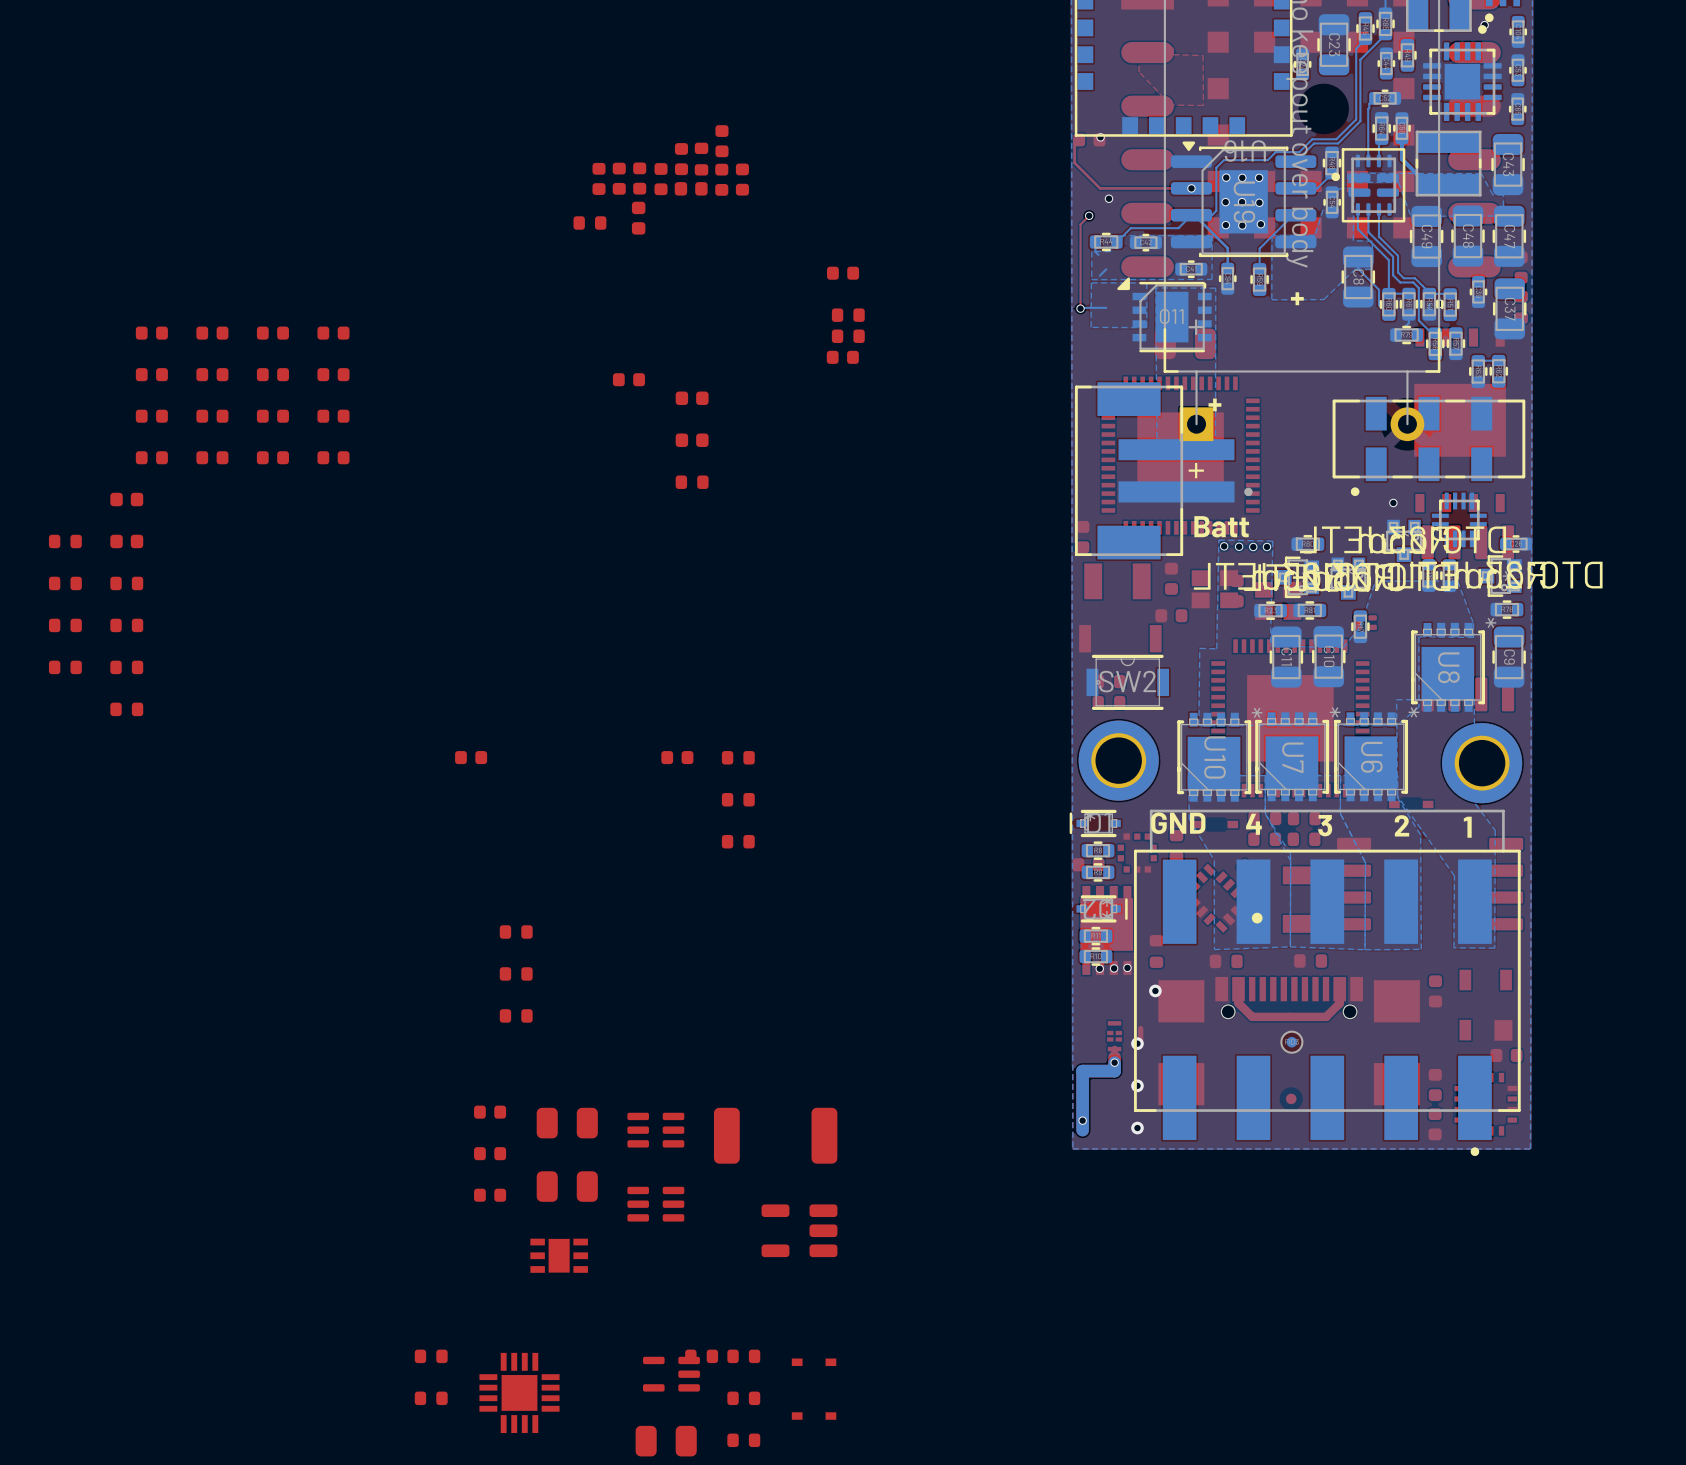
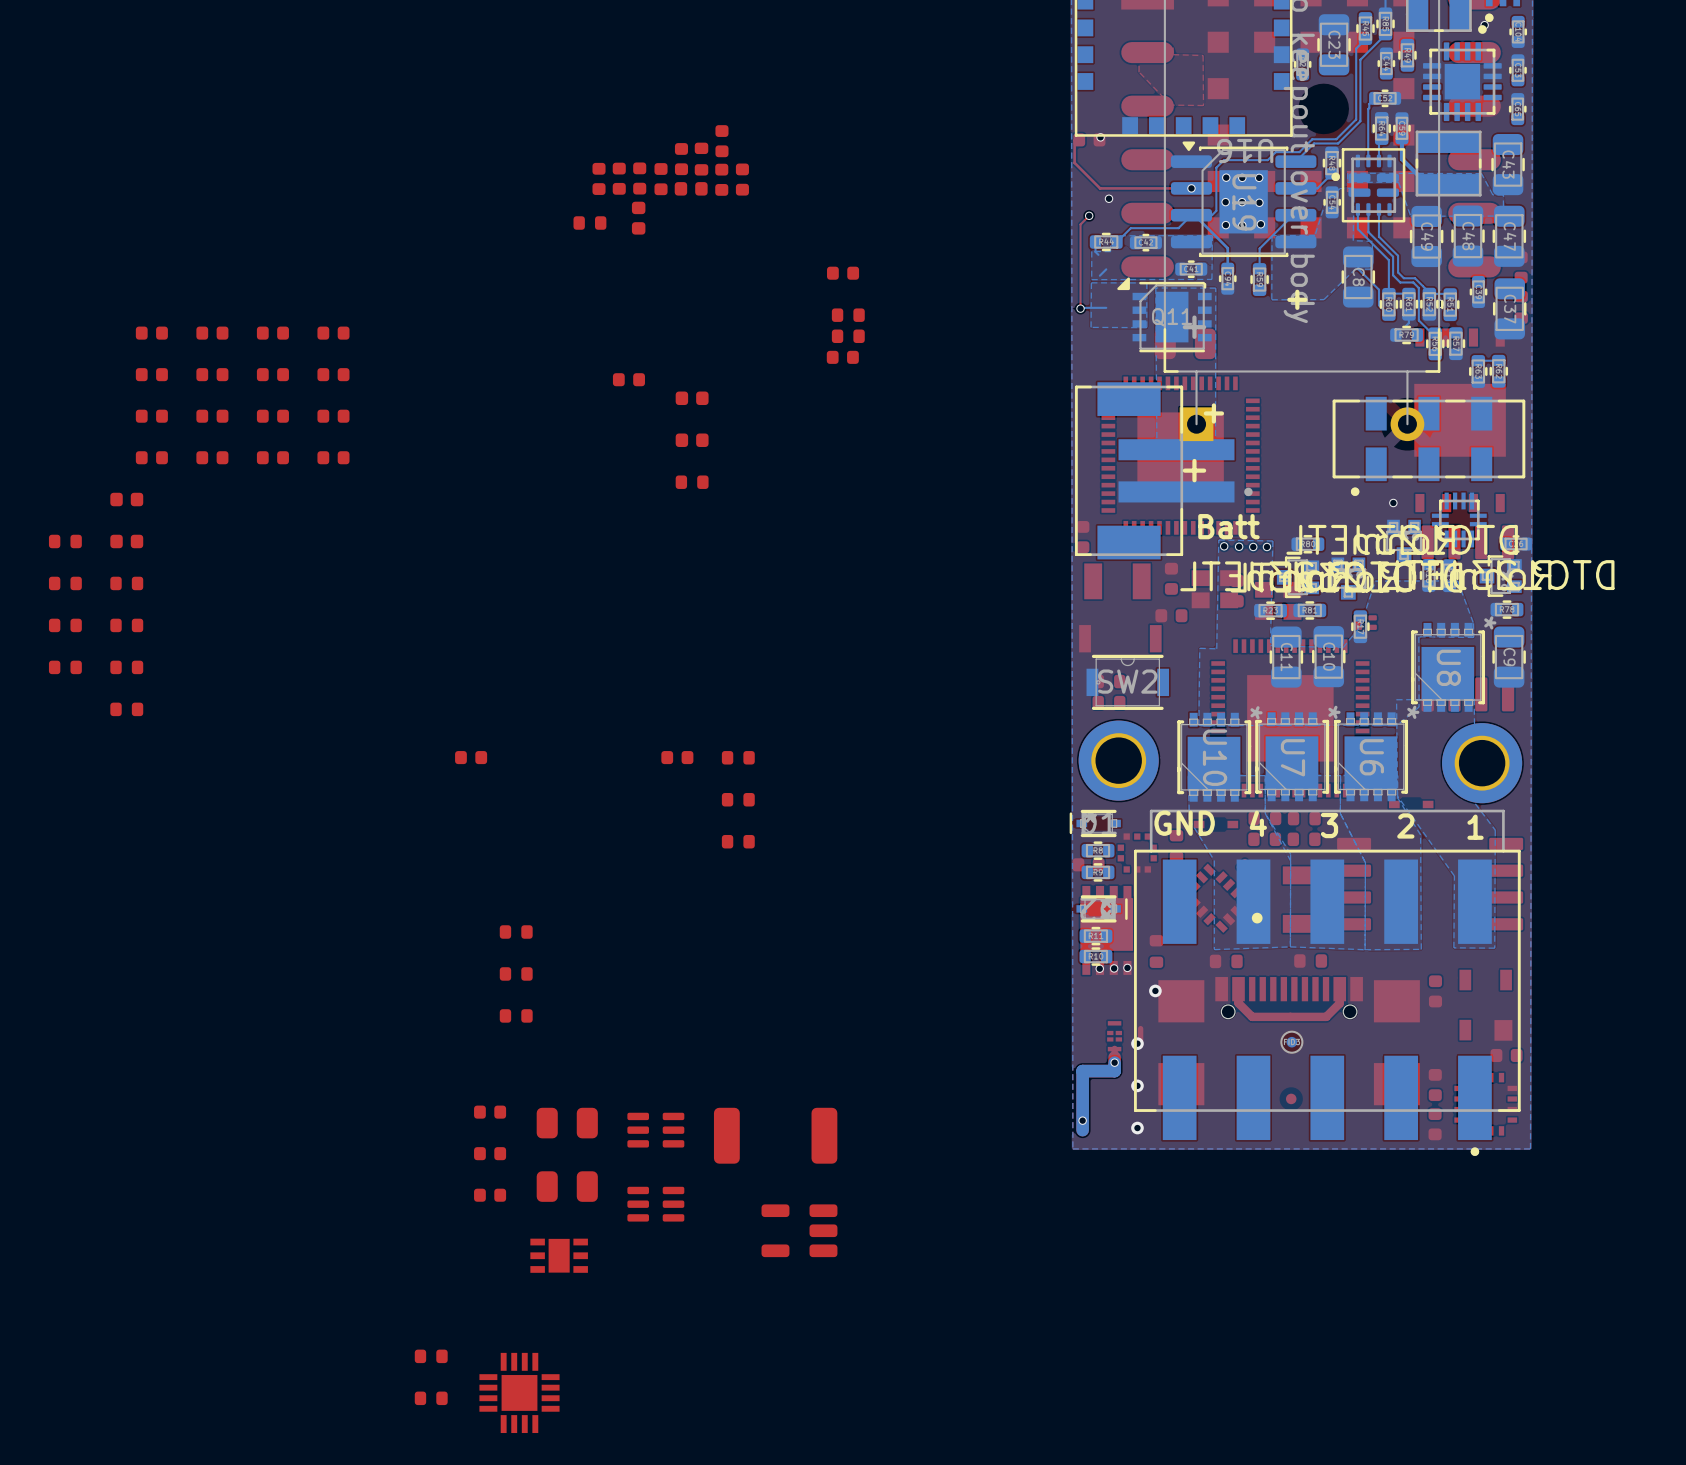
part: (701, 1356) -> none
part: (743, 1356) -> none
part: (814, 1362) -> none
part: (671, 1374) -> none
part: (743, 1398) -> none
part: (814, 1416) -> none
part: (743, 1440) -> none
part: (666, 1441) -> none

